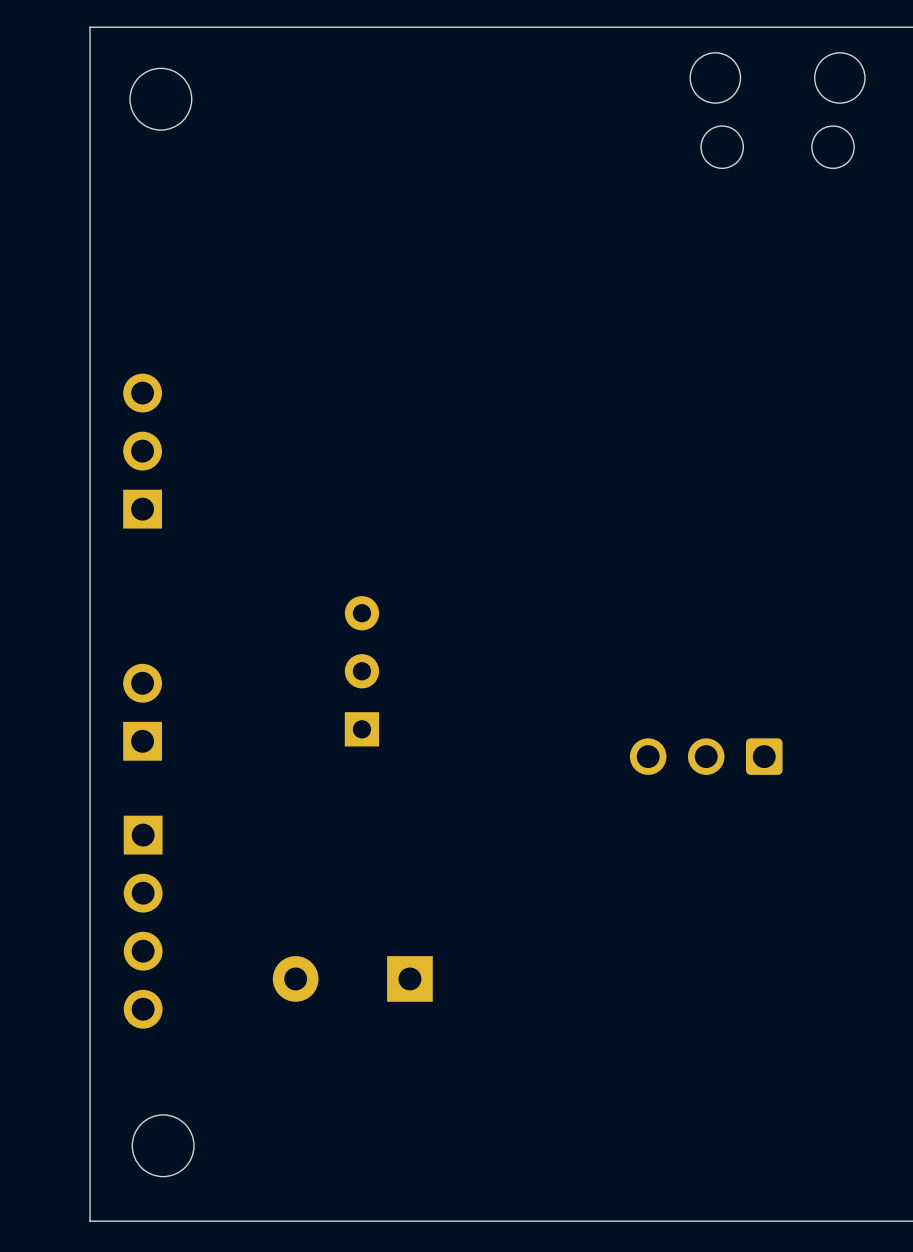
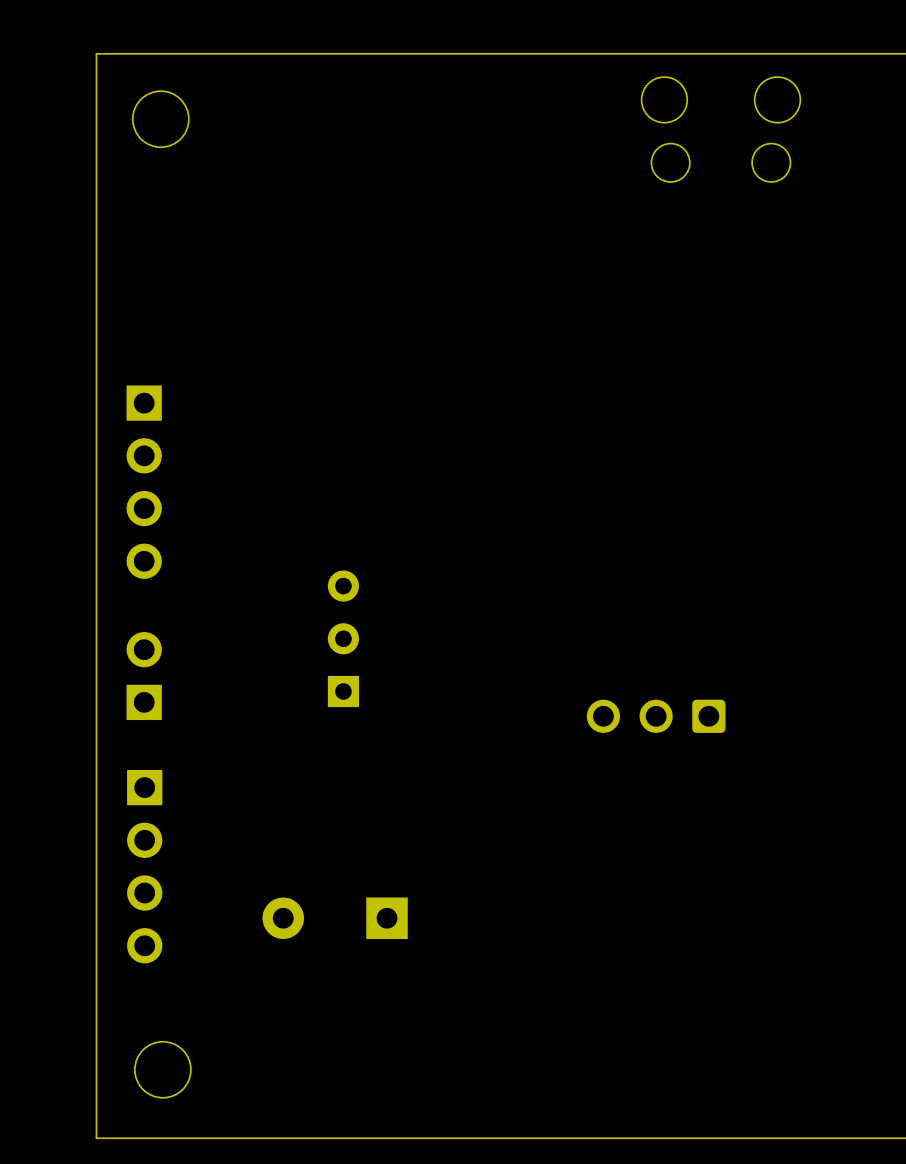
part: (142, 451) -> none
part: none -> (144, 482)

